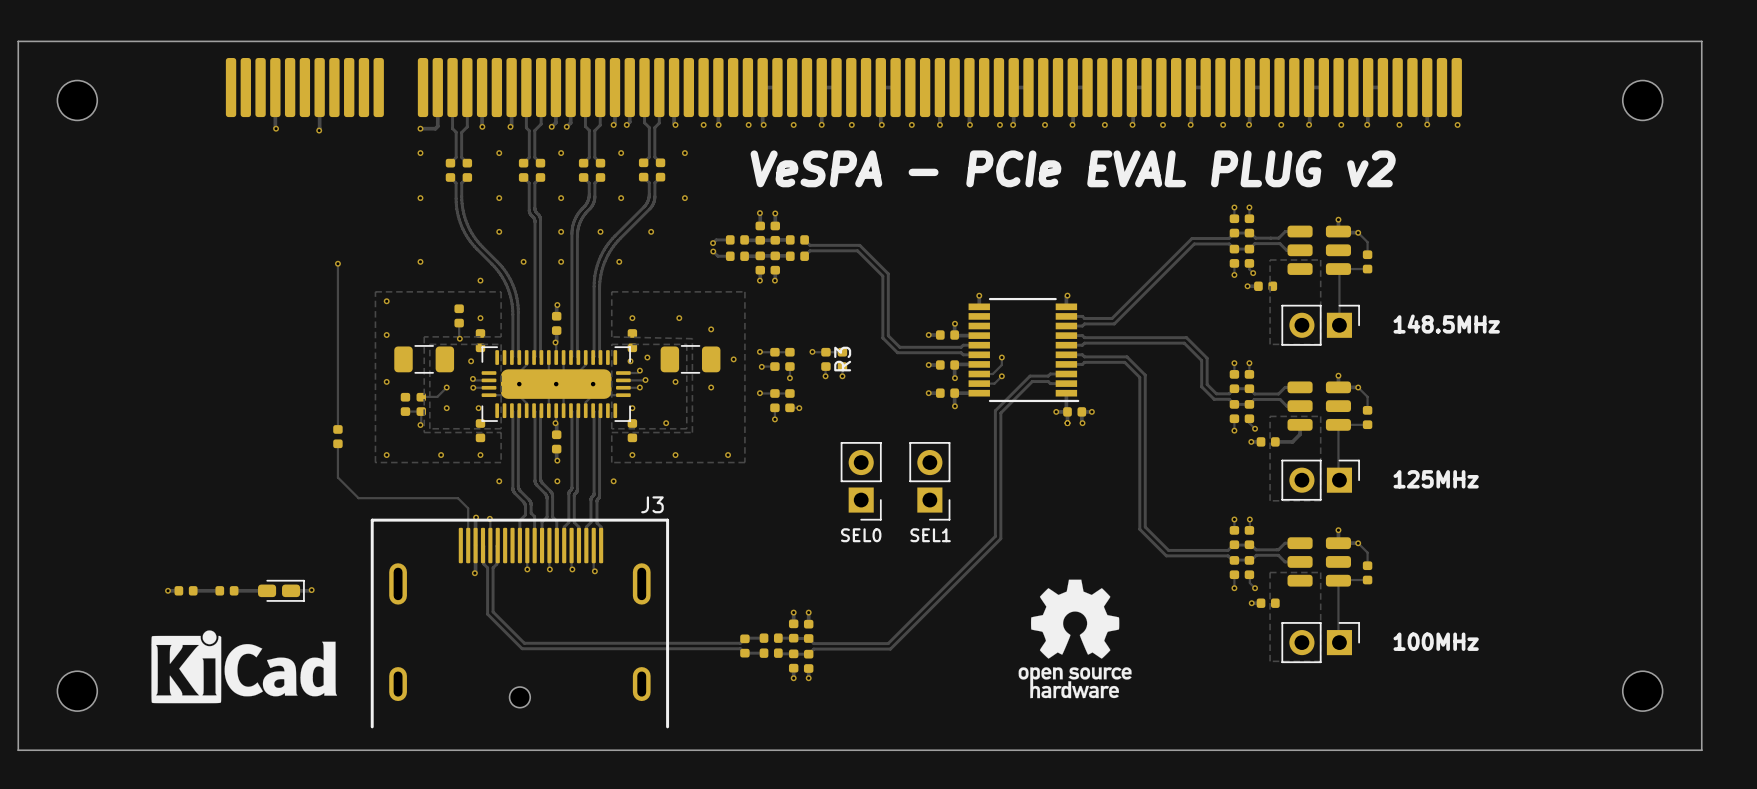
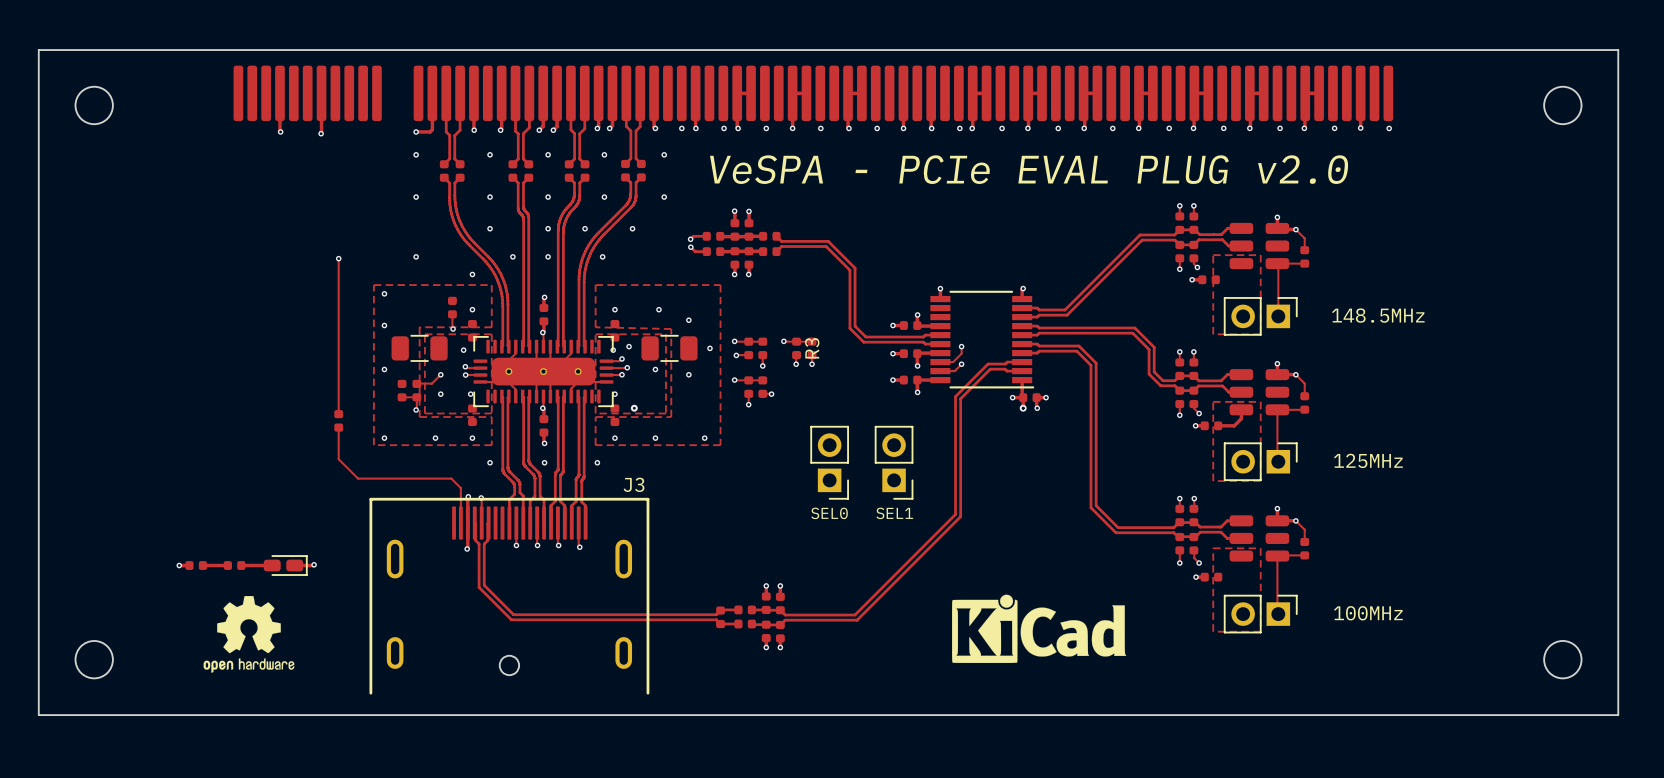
text: VeSPA - PCIe EVAL PLUG v2 (1073, 168) -> VeSPA - PCIe EVAL PLUG v2.0 (1029, 169)
via: none -> (634, 408)
via: (666, 423) -> none
via: none -> (1023, 408)
drawing: [1018, 579, 1132, 699] -> none
drawing: none -> [952, 594, 1127, 664]
drawing shape: [151, 630, 338, 704] -> [203, 596, 295, 673]

